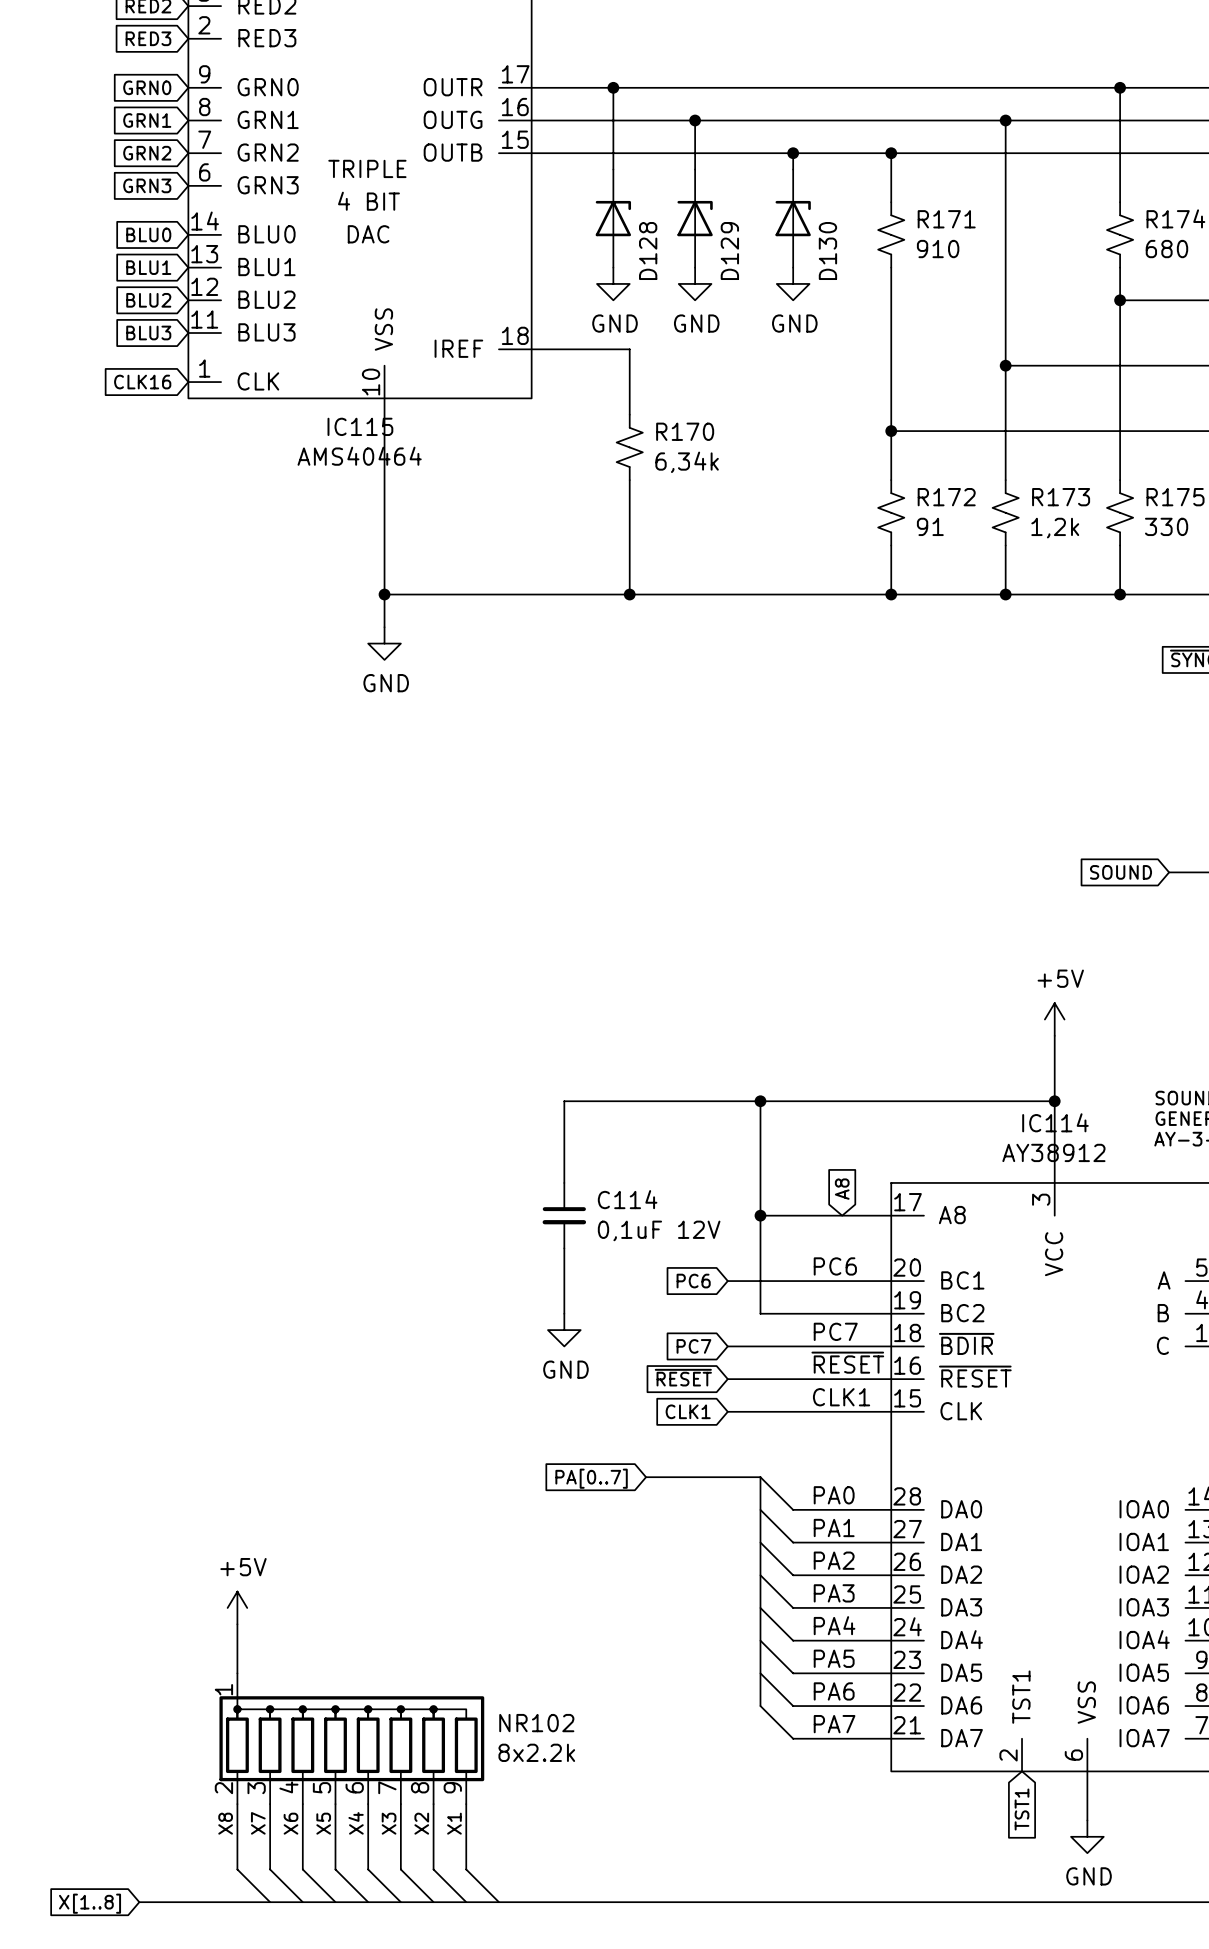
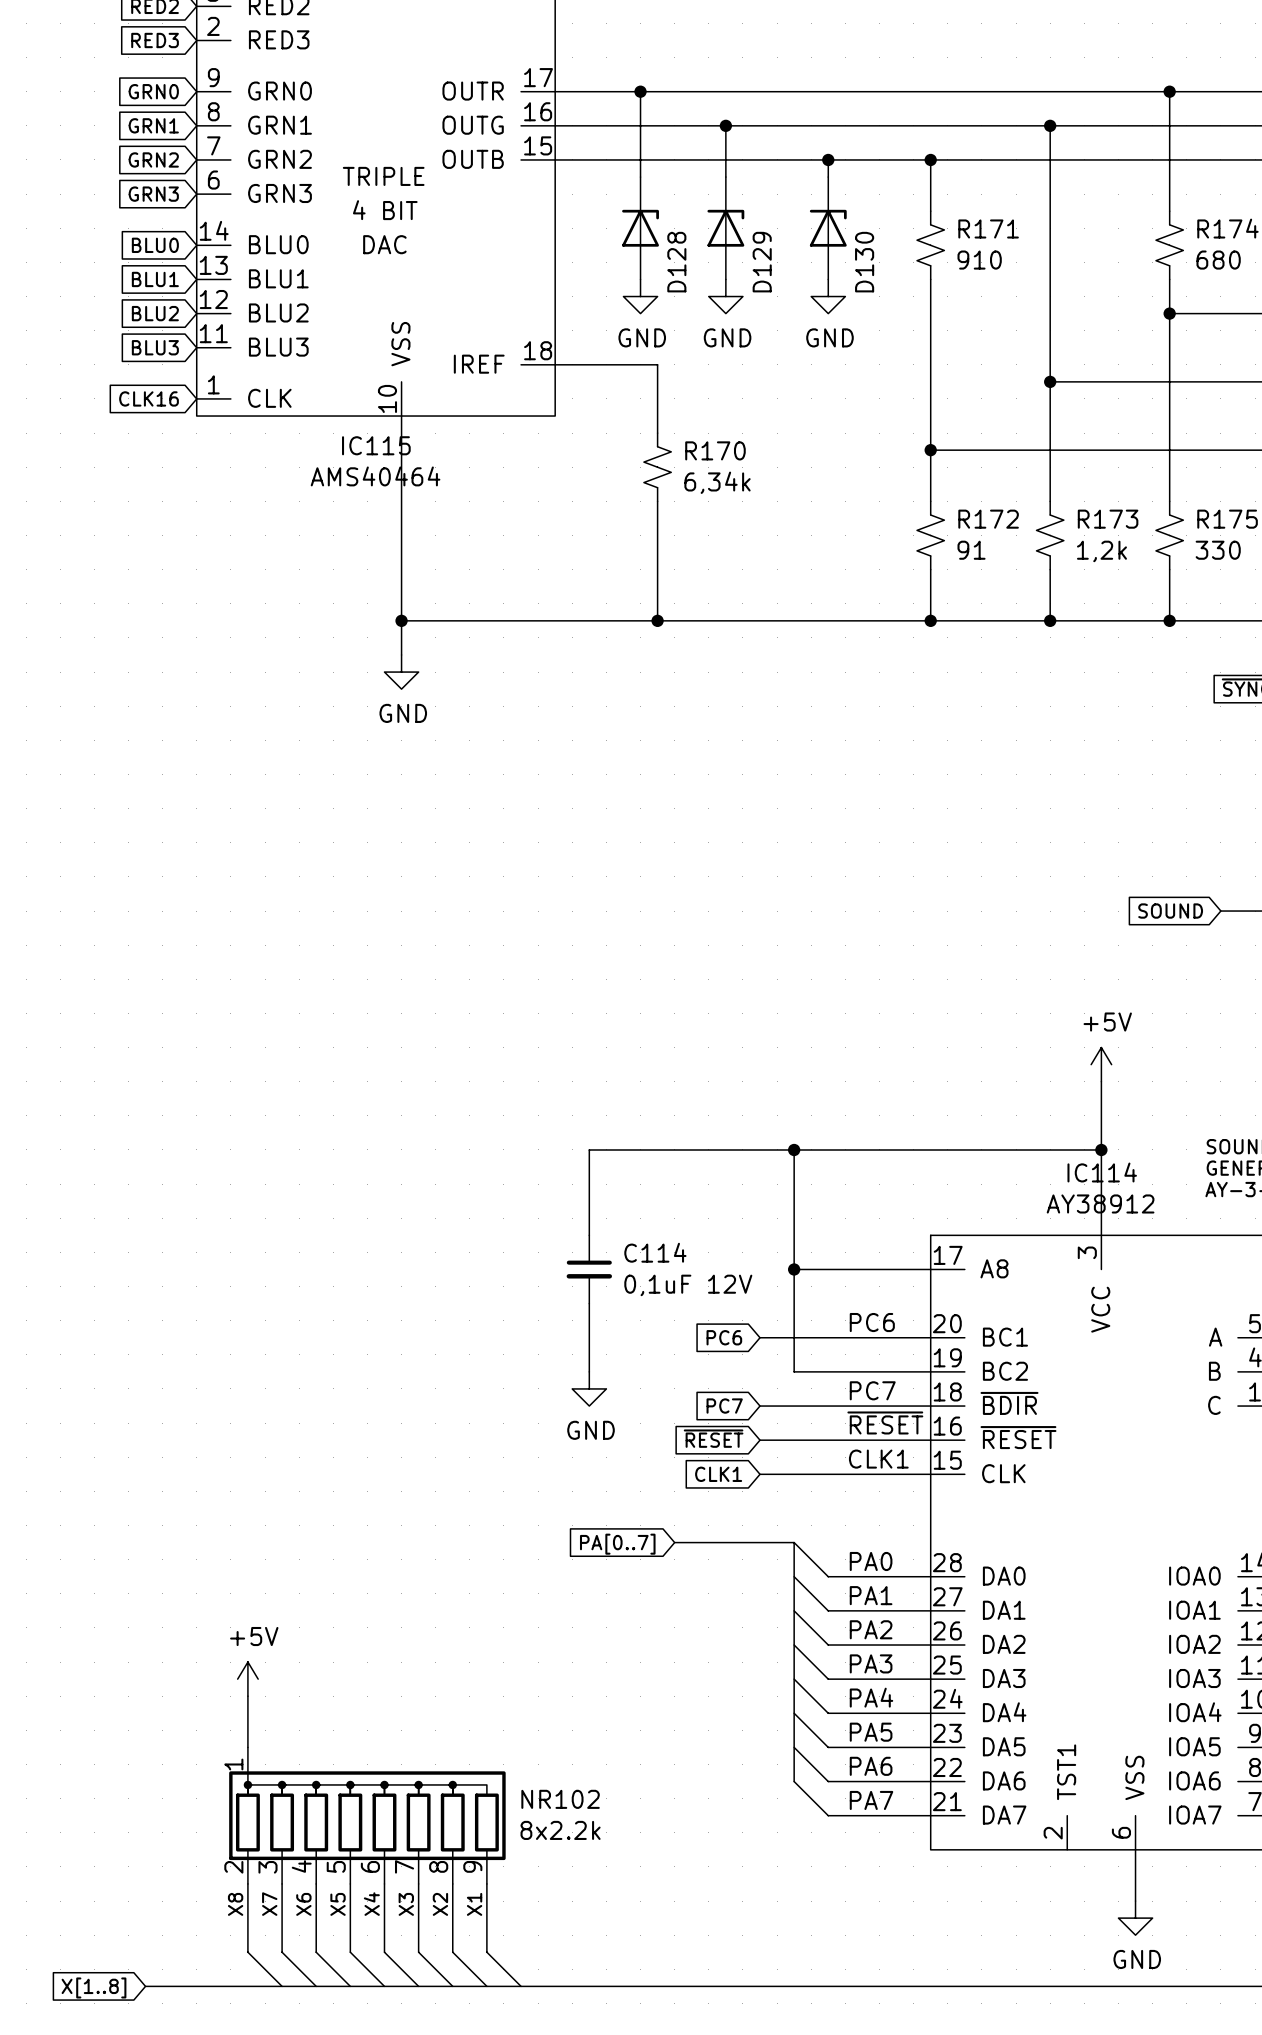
global label: A8 (842, 1189) -> none
global label: TST1 (1022, 1809) -> none

